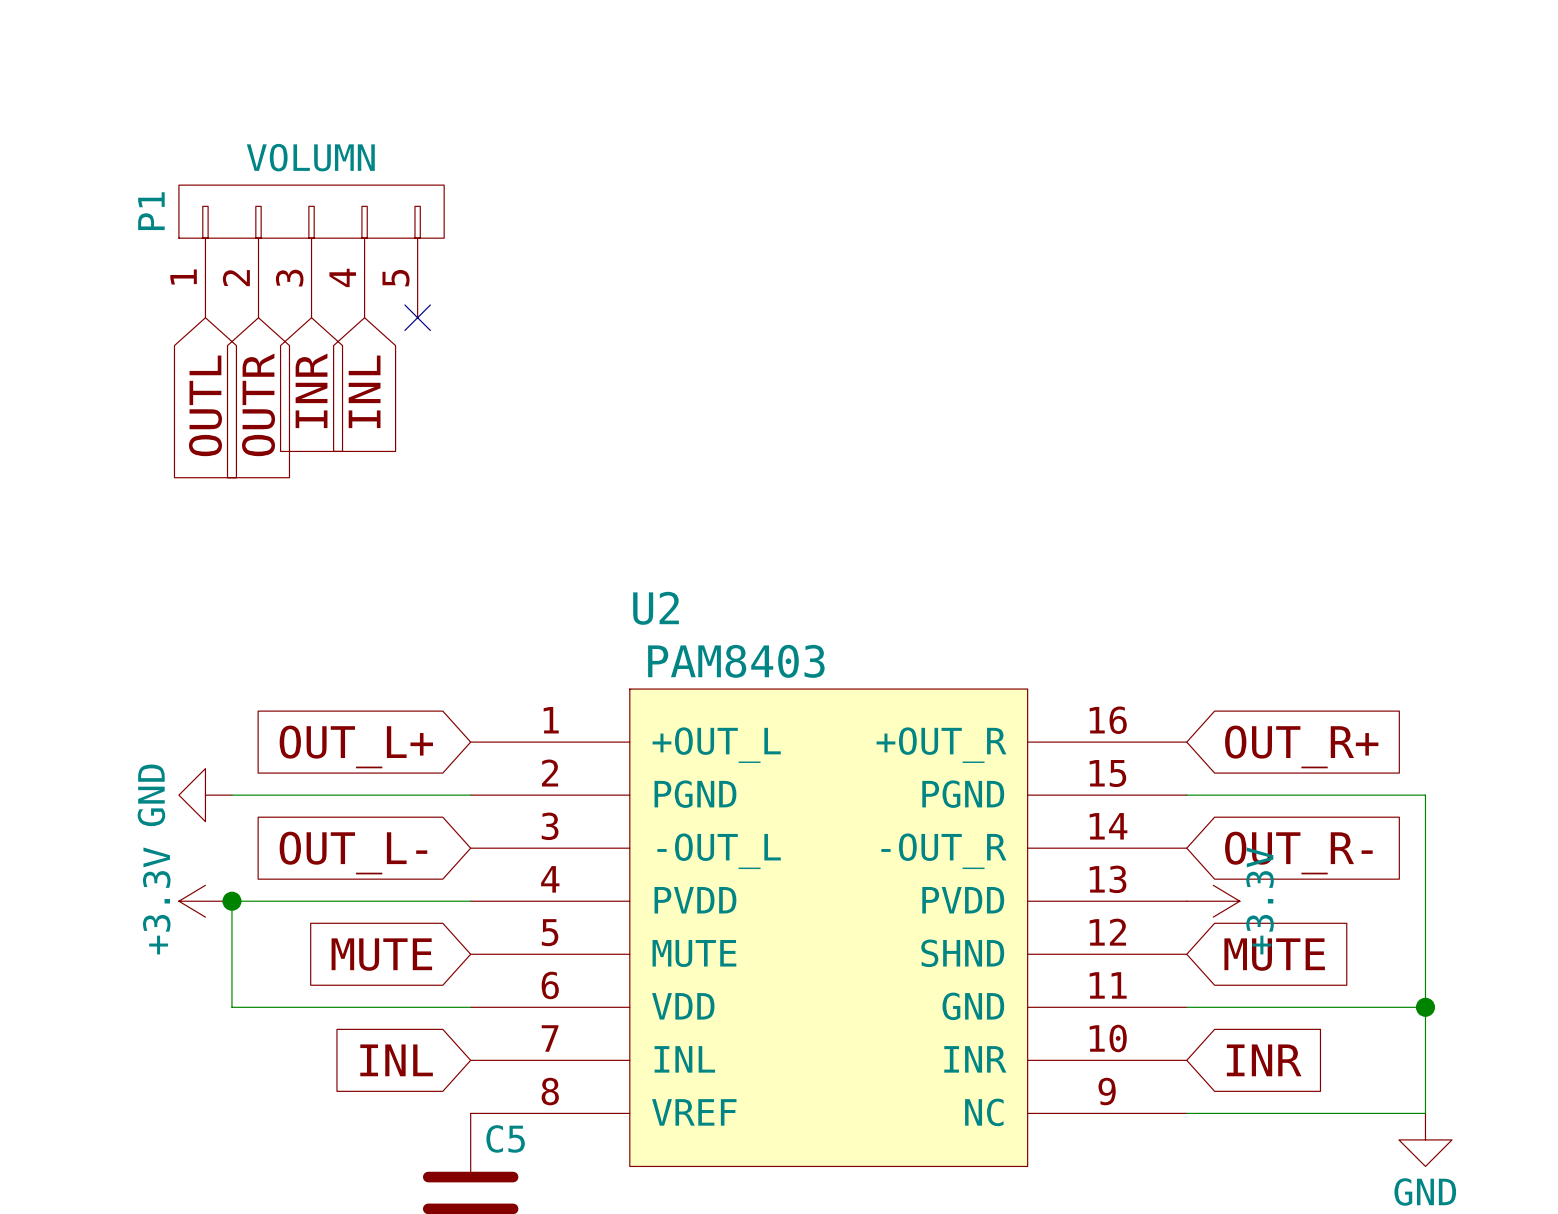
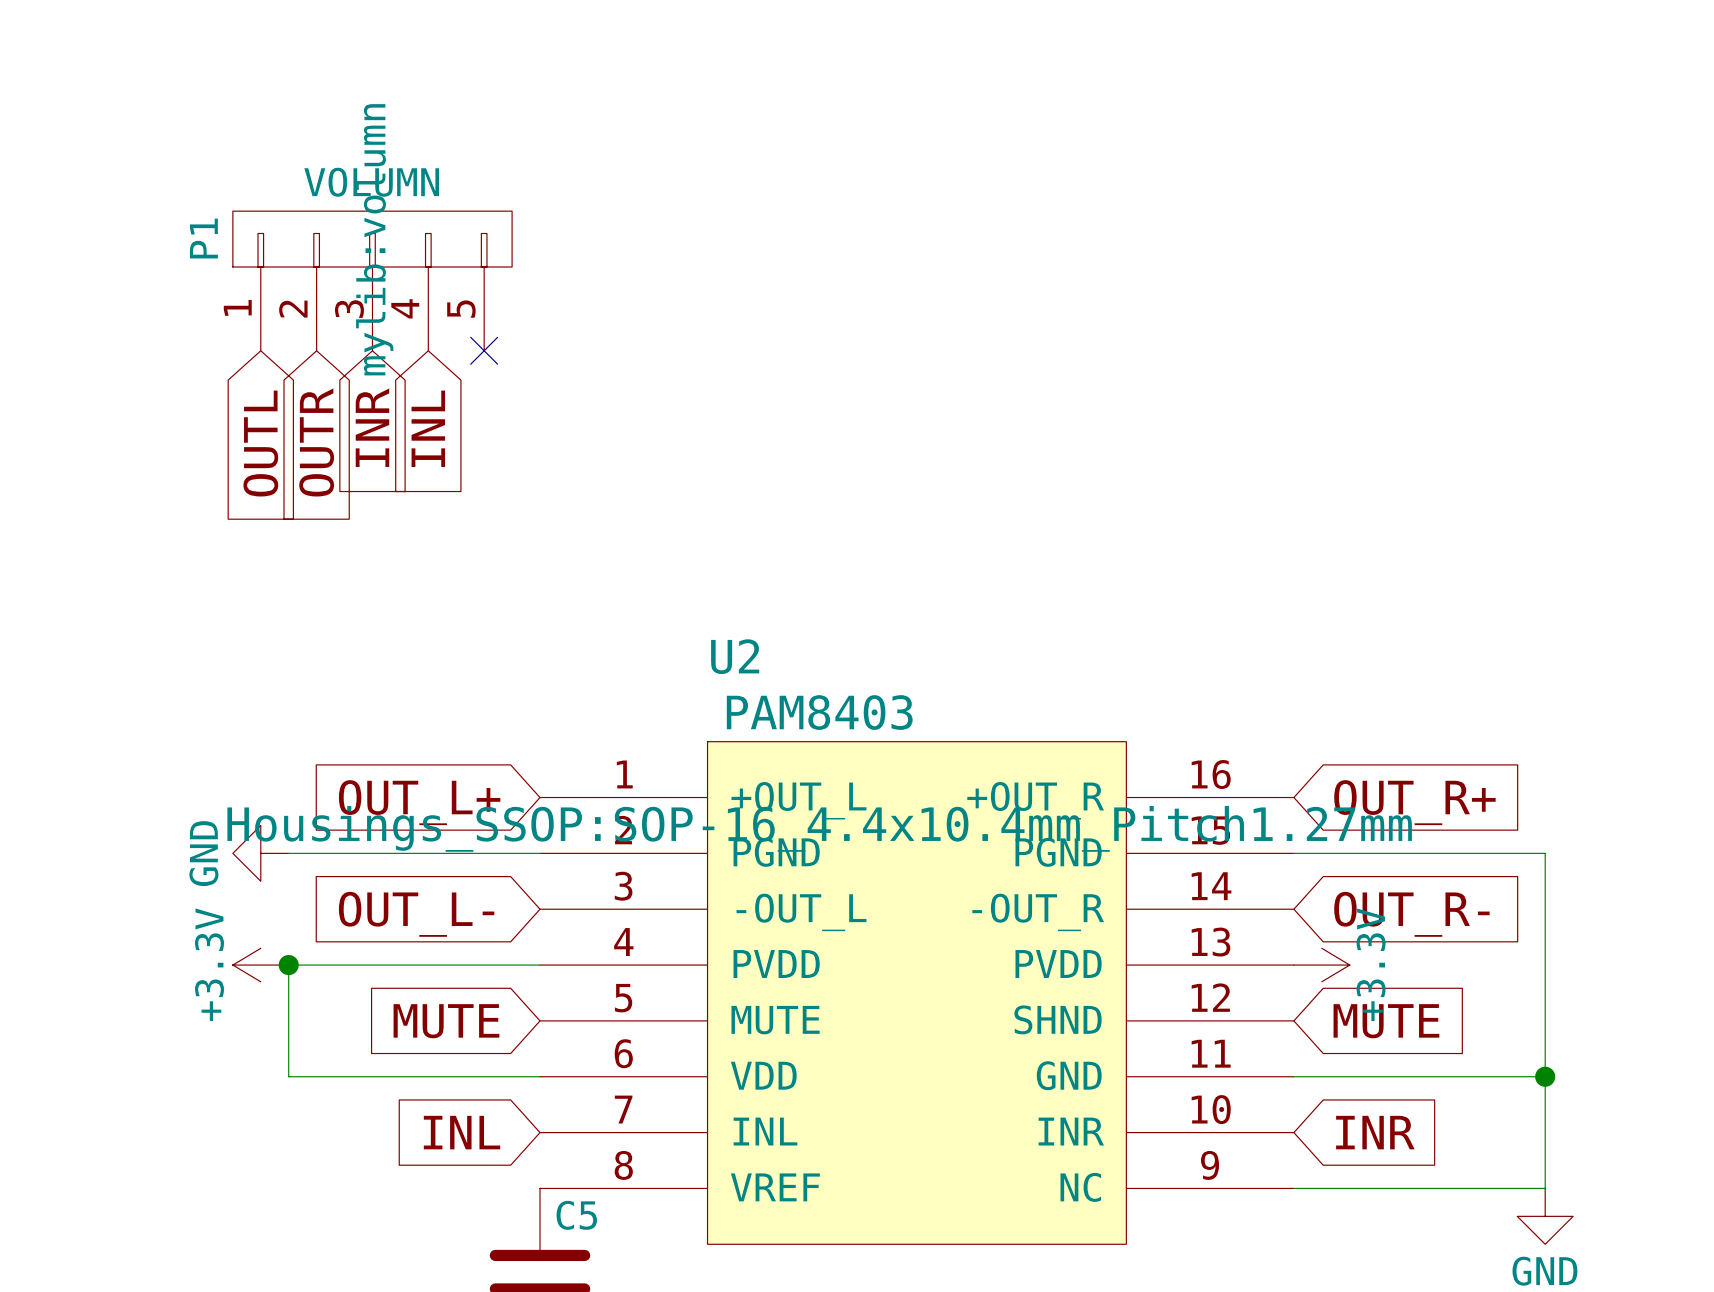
P1 text: none -> mylib:volumn (374, 239)
U2 text: none -> Housings_SSOP:SOP-16_4.4x10.4mm_Pitch1.27mm (819, 828)

